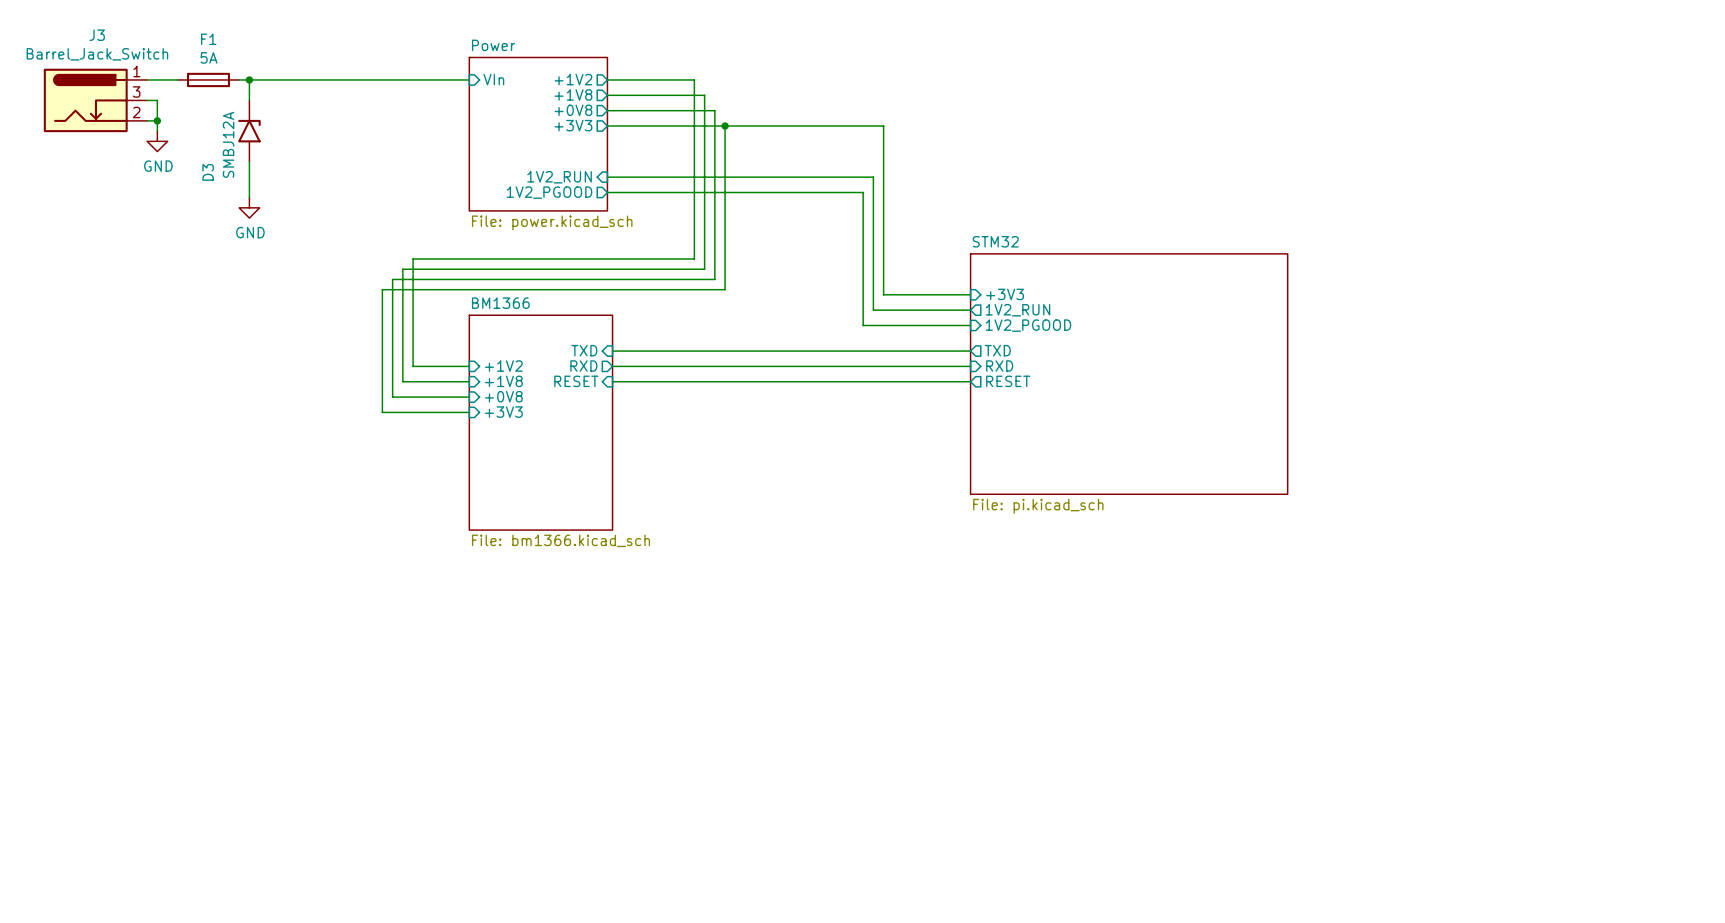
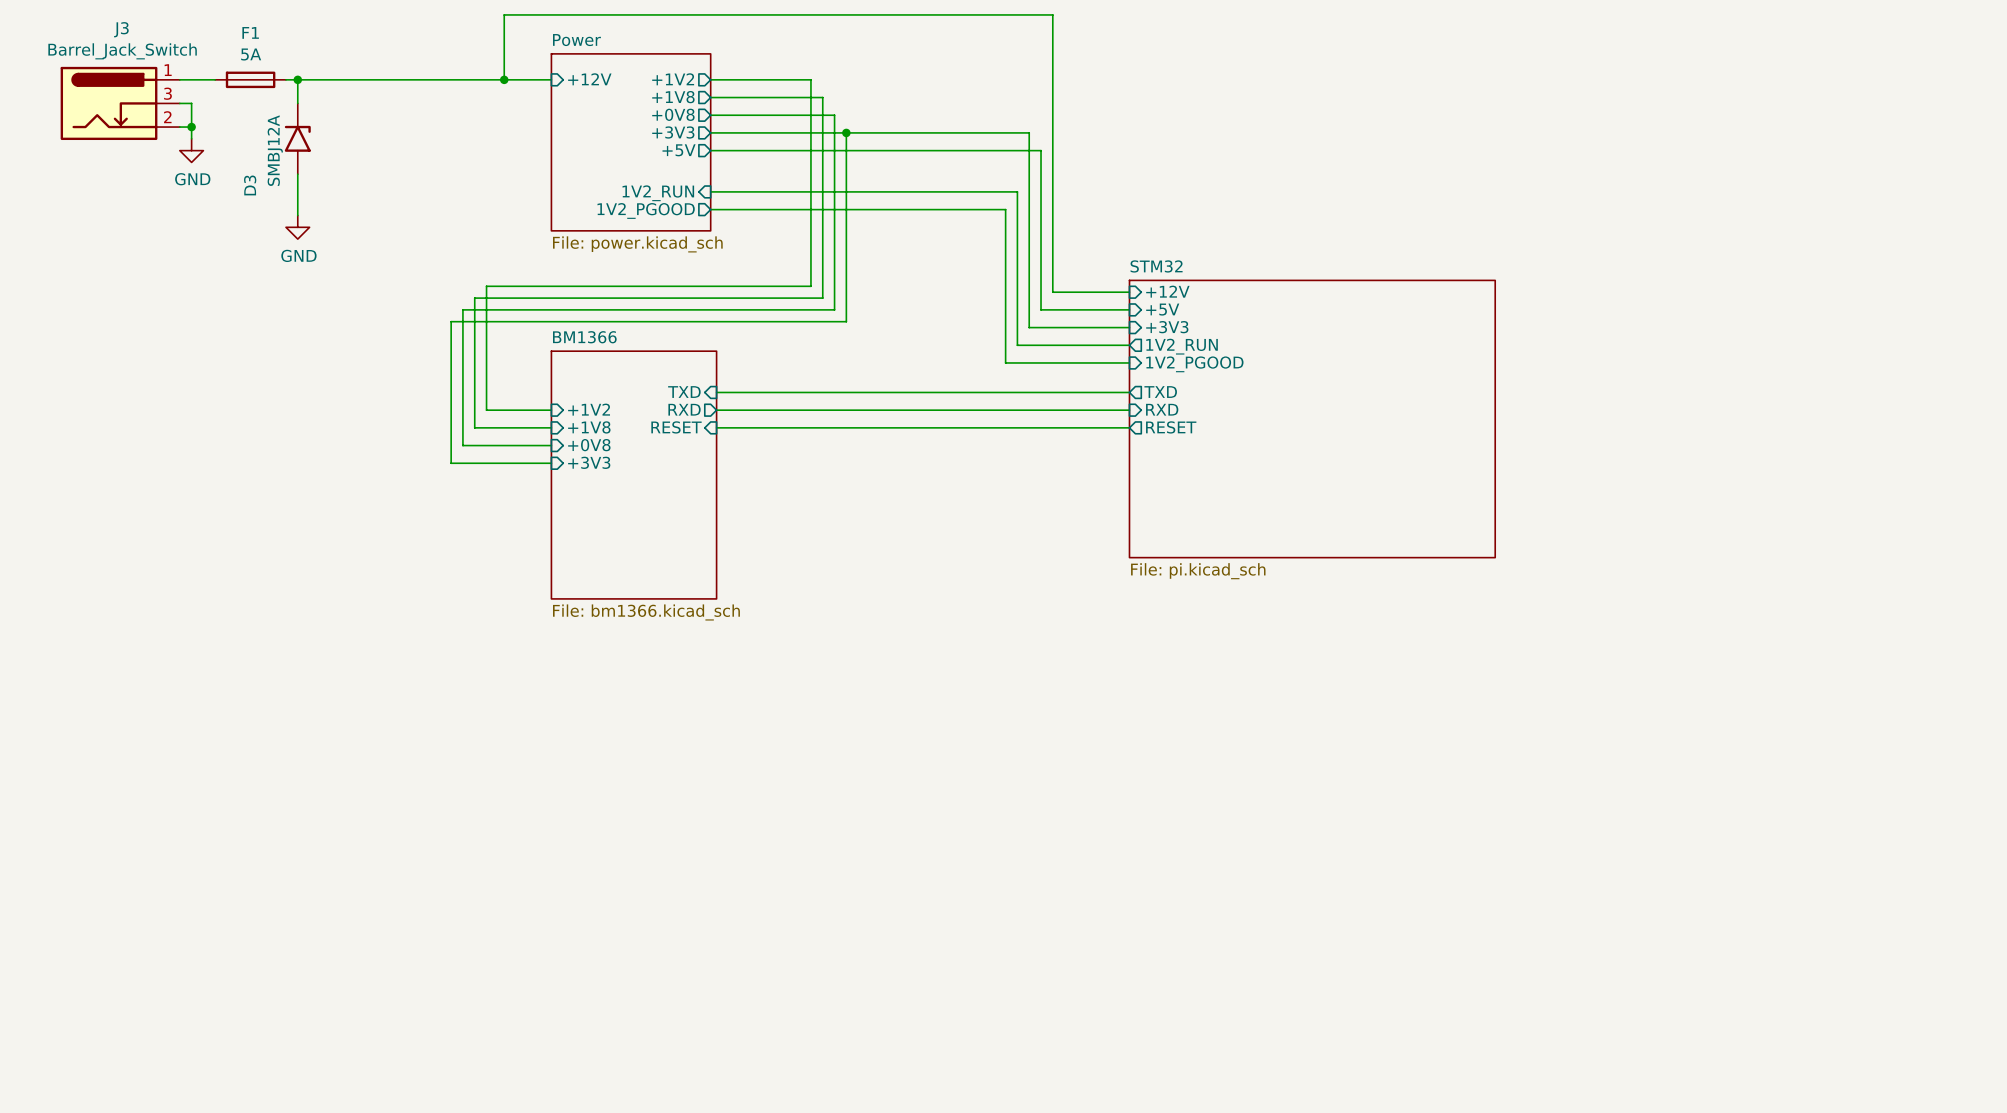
wire: none -> (504, 79) (504, 14) (1052, 14) (1052, 292) (1129, 292)
junction: none -> (504, 79)
sheet pin: VIn (493, 79) -> +12V (589, 79)
sheet pin: none -> +5V (679, 150)
wire: none -> (710, 150) (1041, 150) (1041, 309) (1129, 309)
sheet pin: none -> +12V (1167, 291)
sheet pin: none -> +5V (1162, 309)

